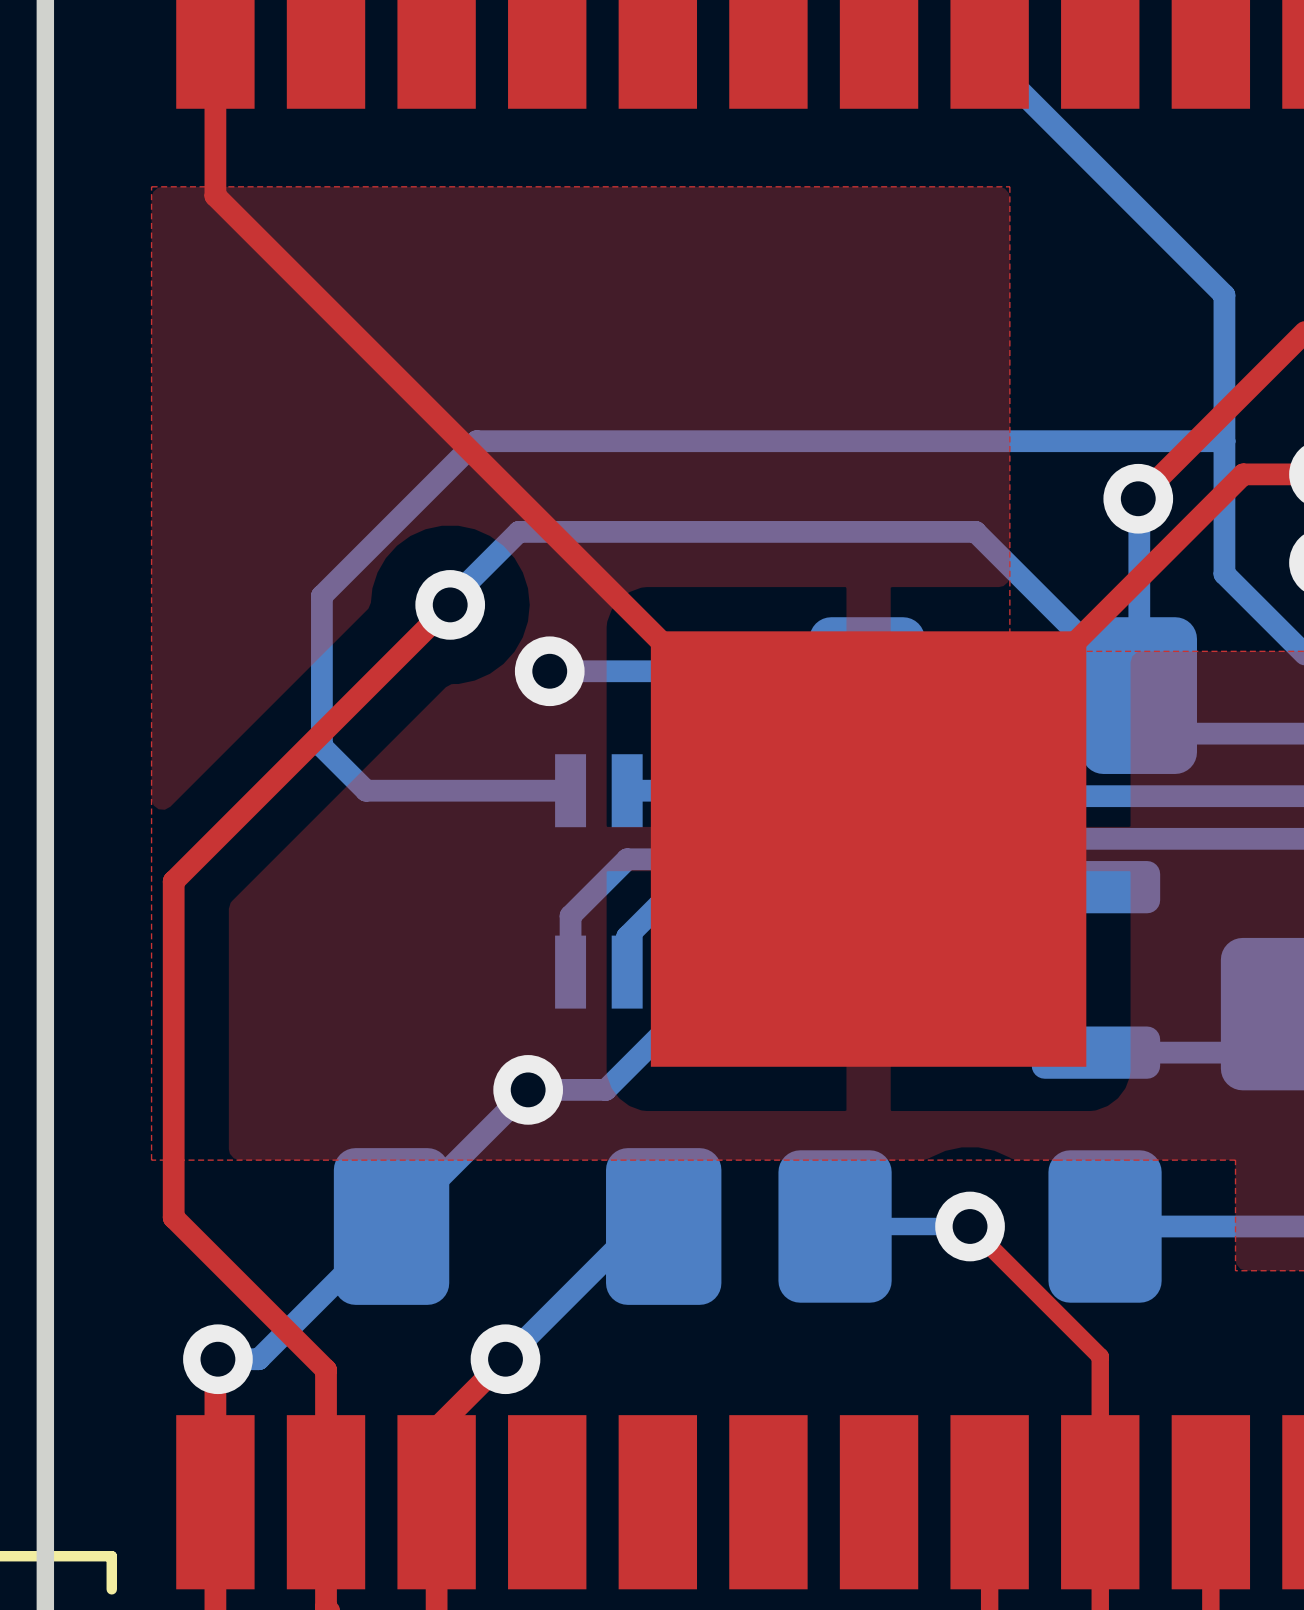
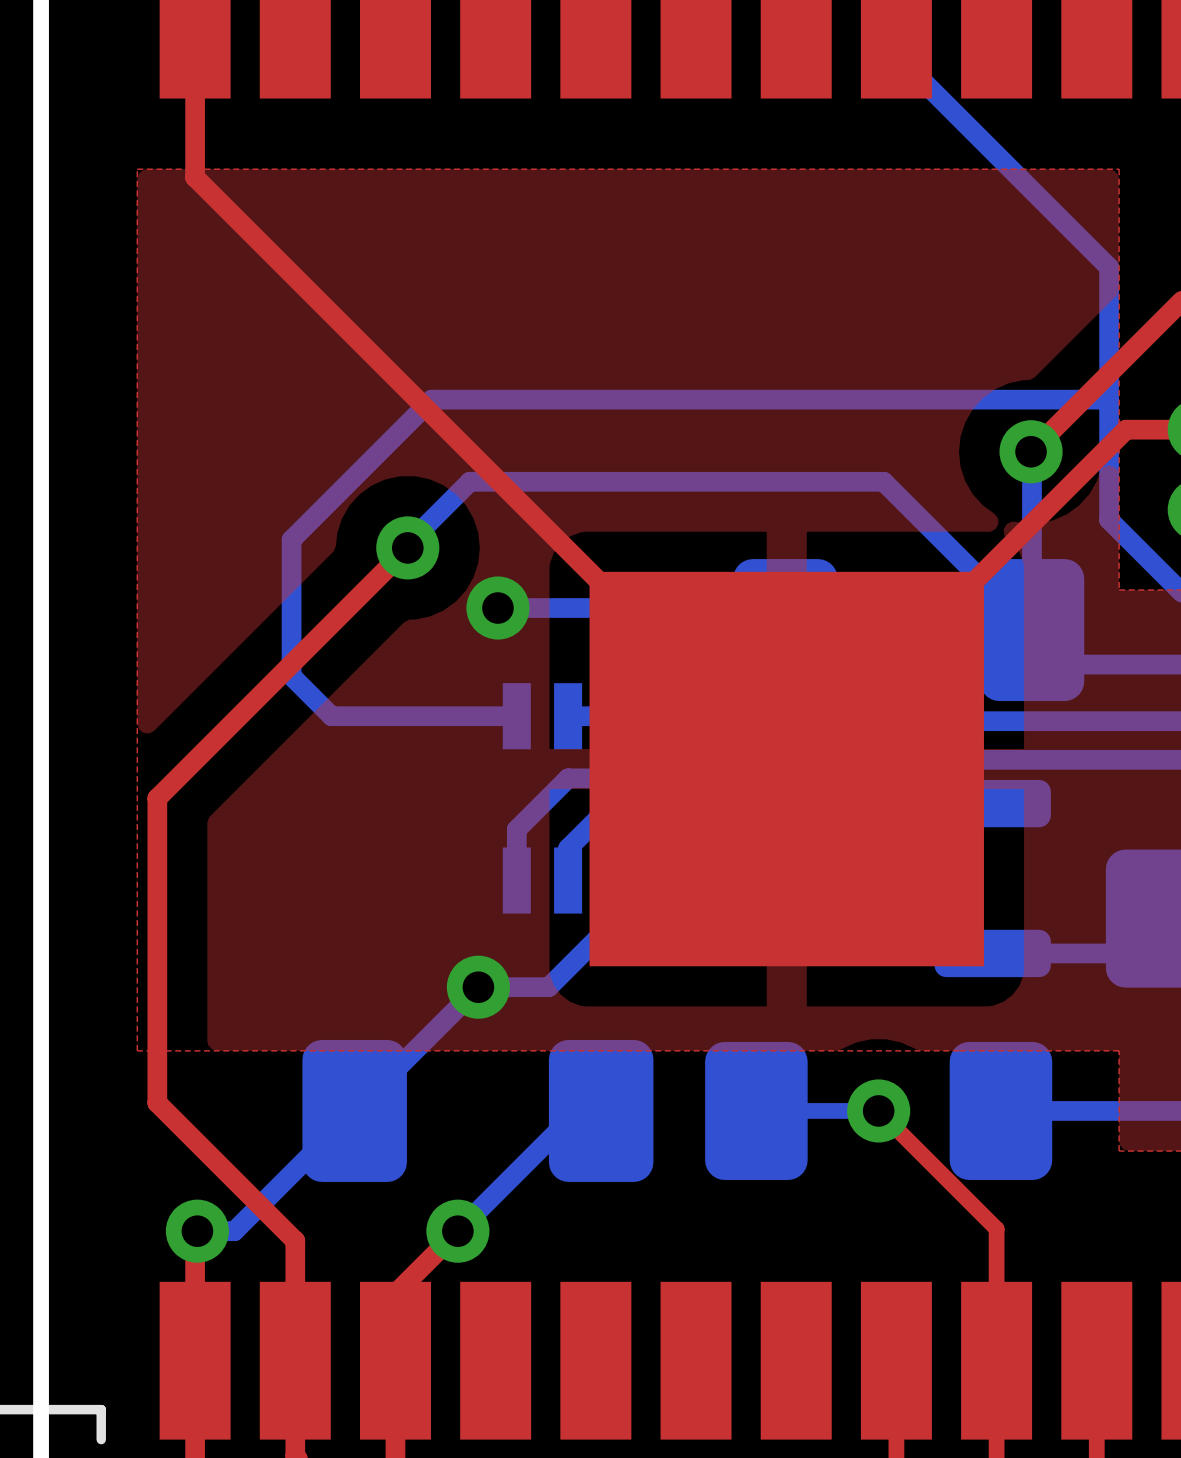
top zone outline: (1009, 186) (1009, 651) (1235, 651) -> (914, 169) (1119, 169) (1119, 589)

